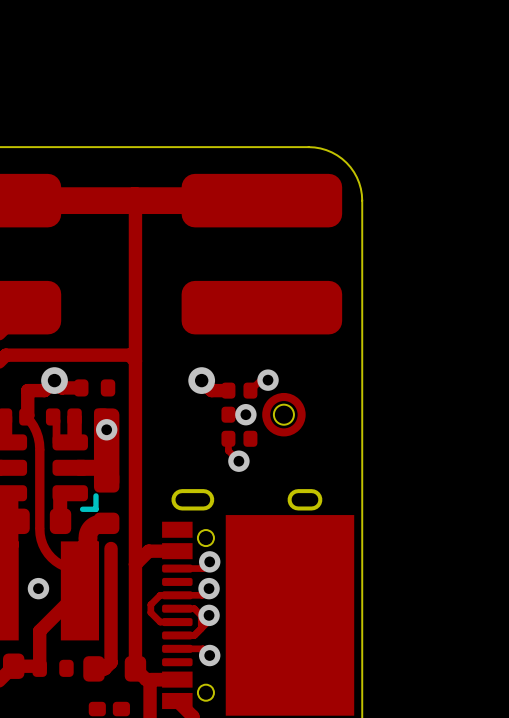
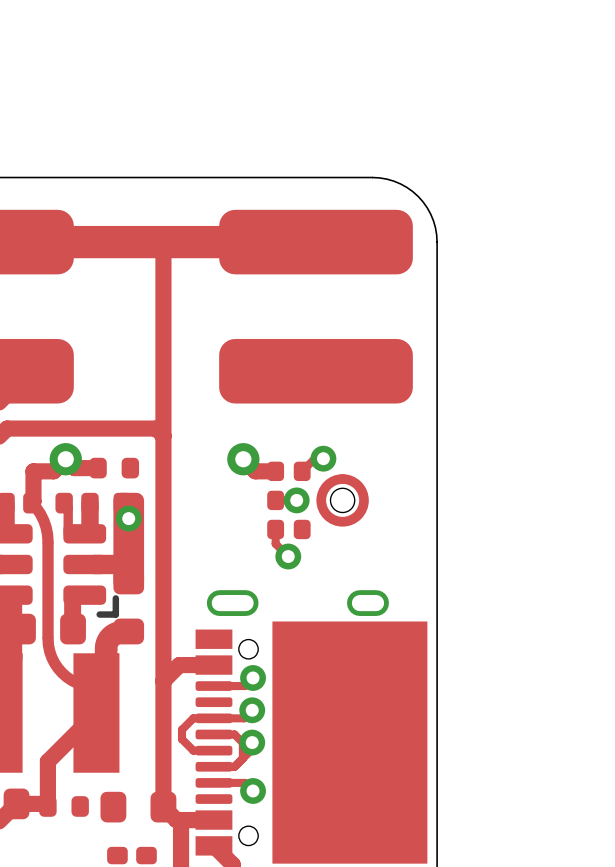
track: (111, 548) (111, 662) (104, 668) (93, 668) -> none
via: (38, 588) -> none

